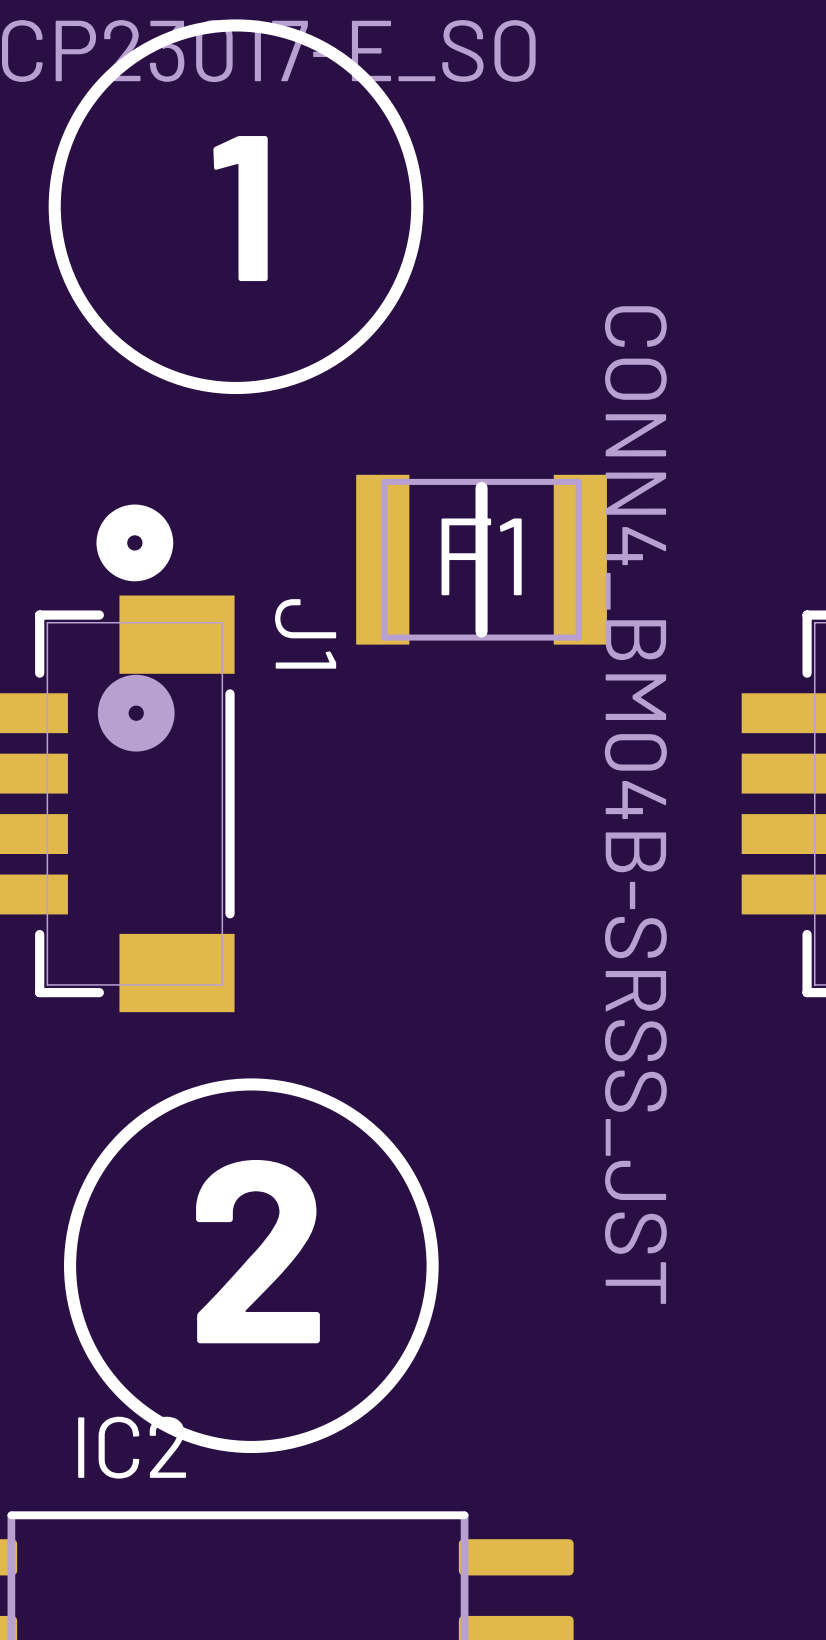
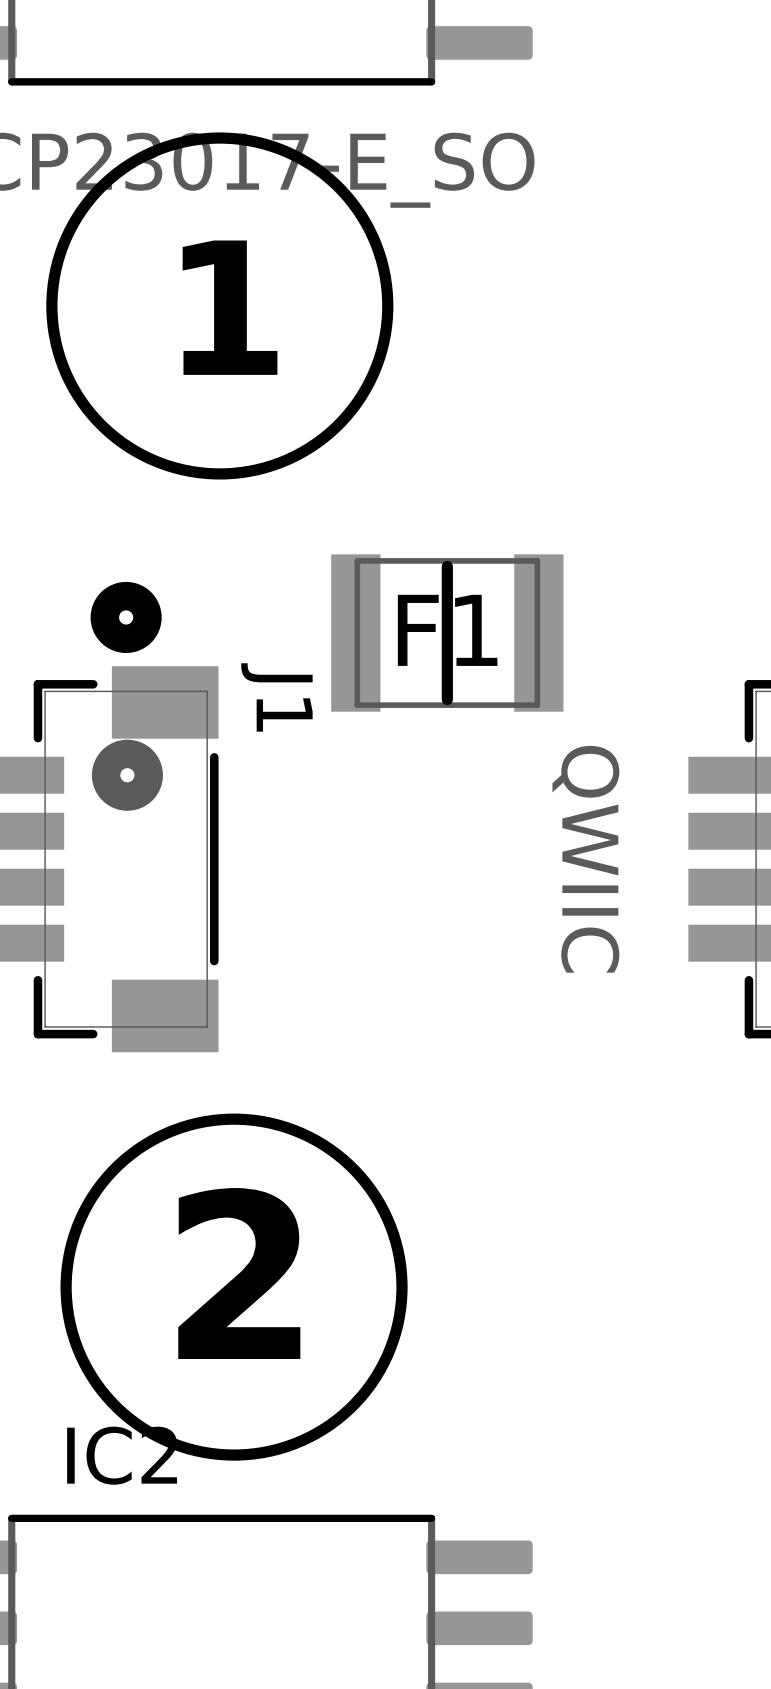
part value: CONN4_BM04B-SRSS_JST (635, 805) -> QWIIC (585, 859)

